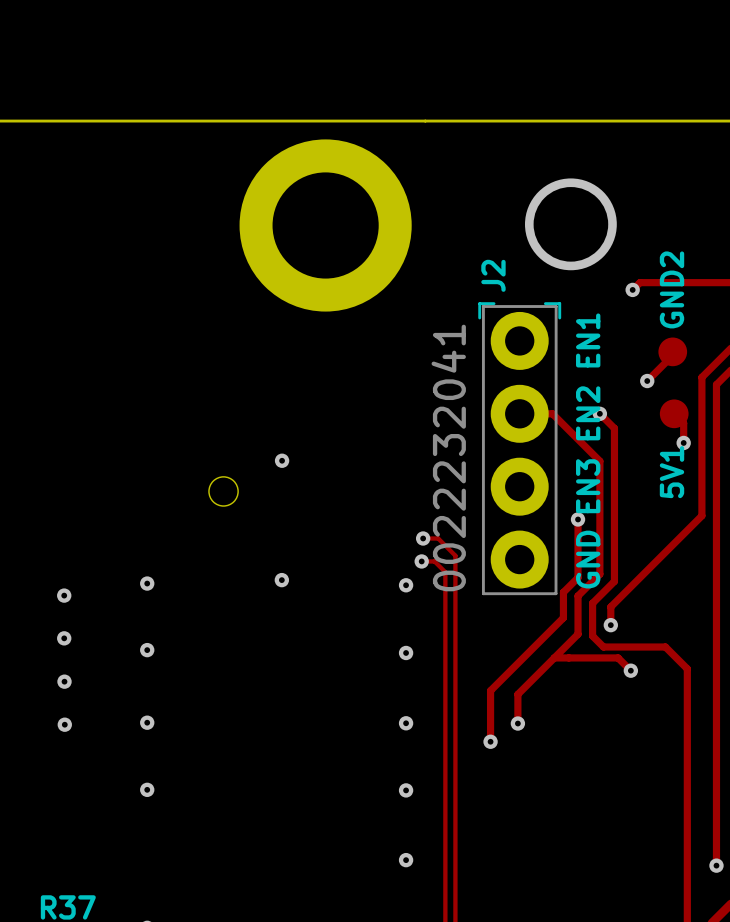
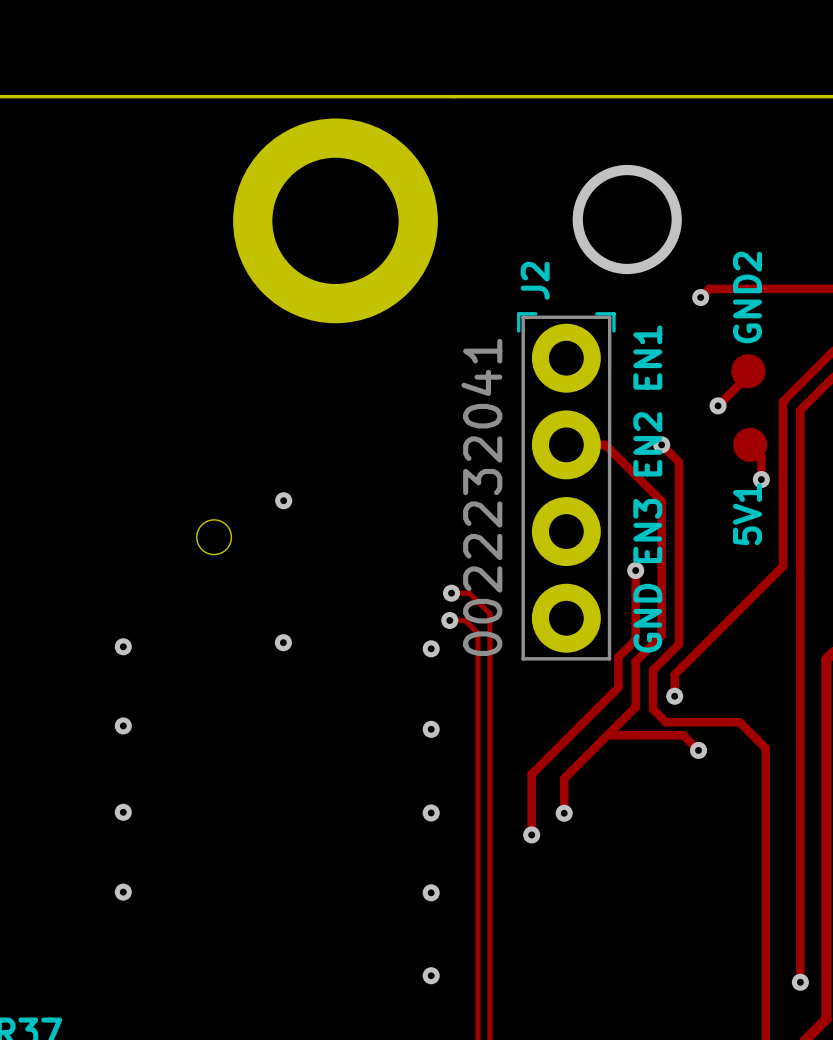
via: (64, 595) -> none
via: (64, 638) -> none
via: (64, 681) -> none
via: (64, 724) -> none

